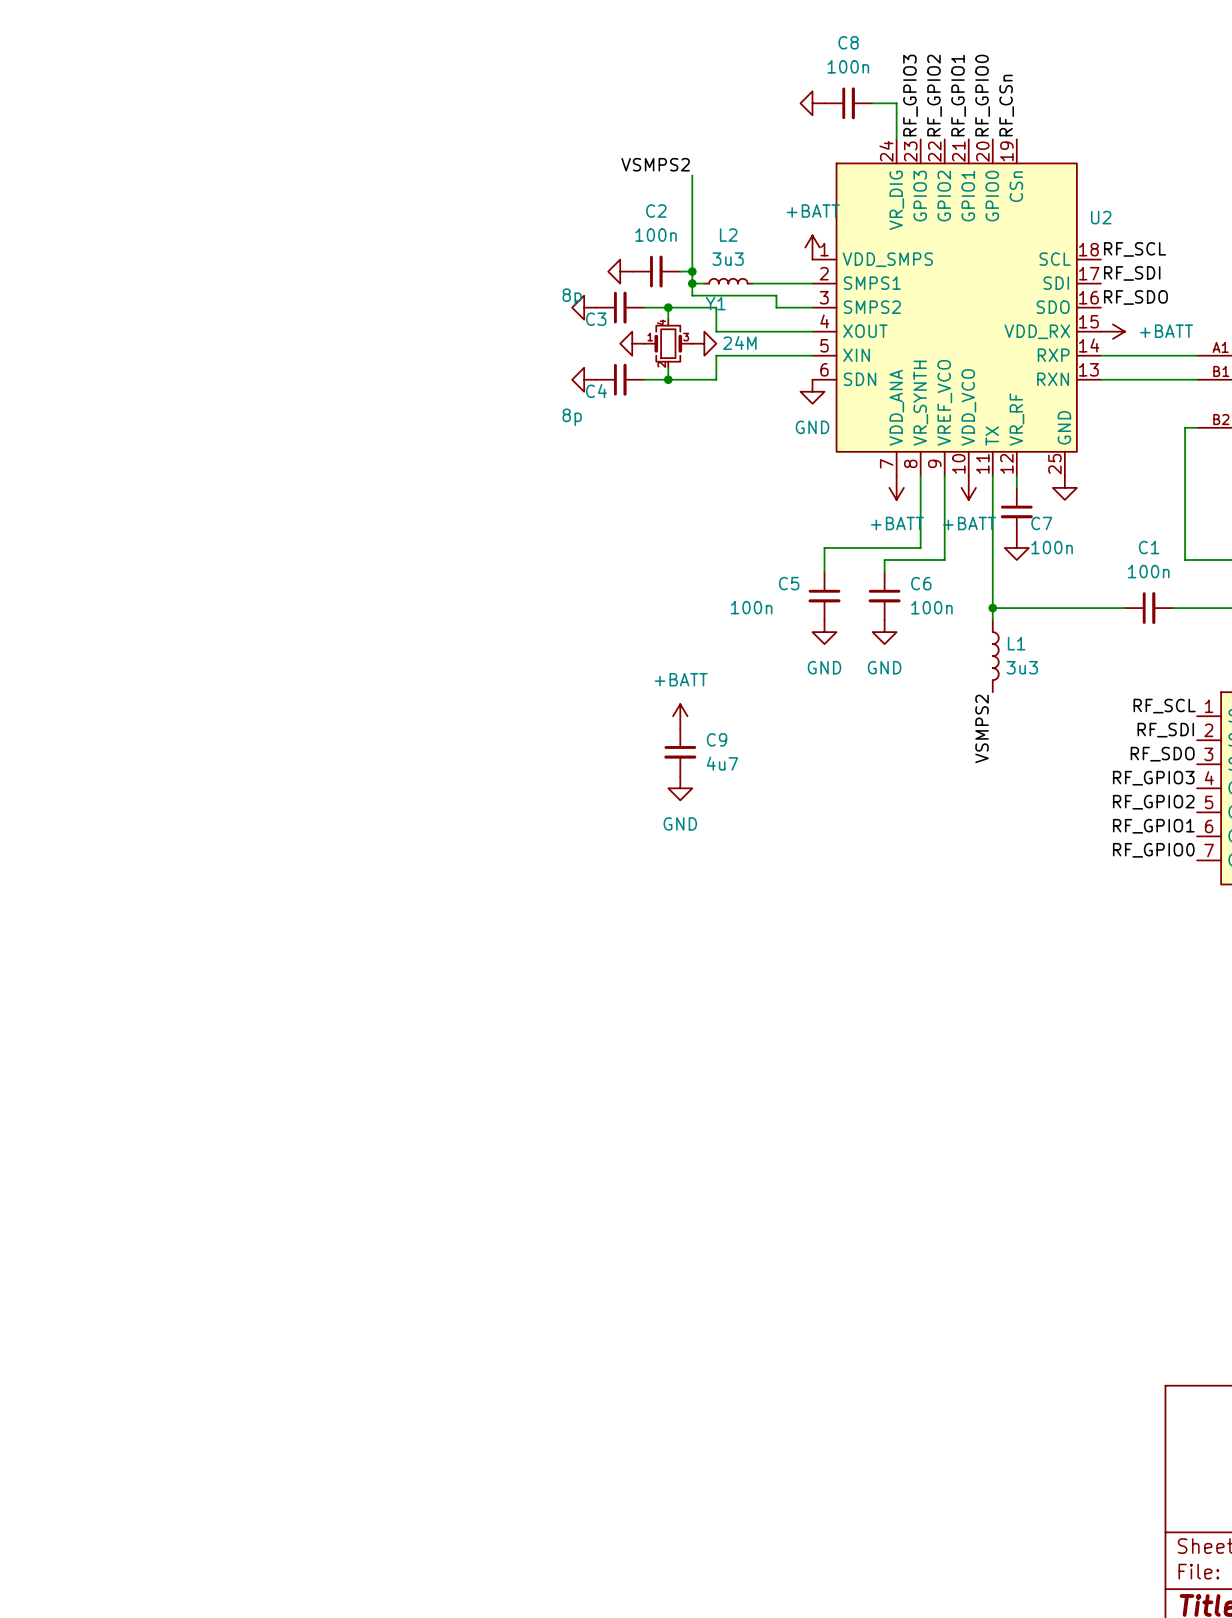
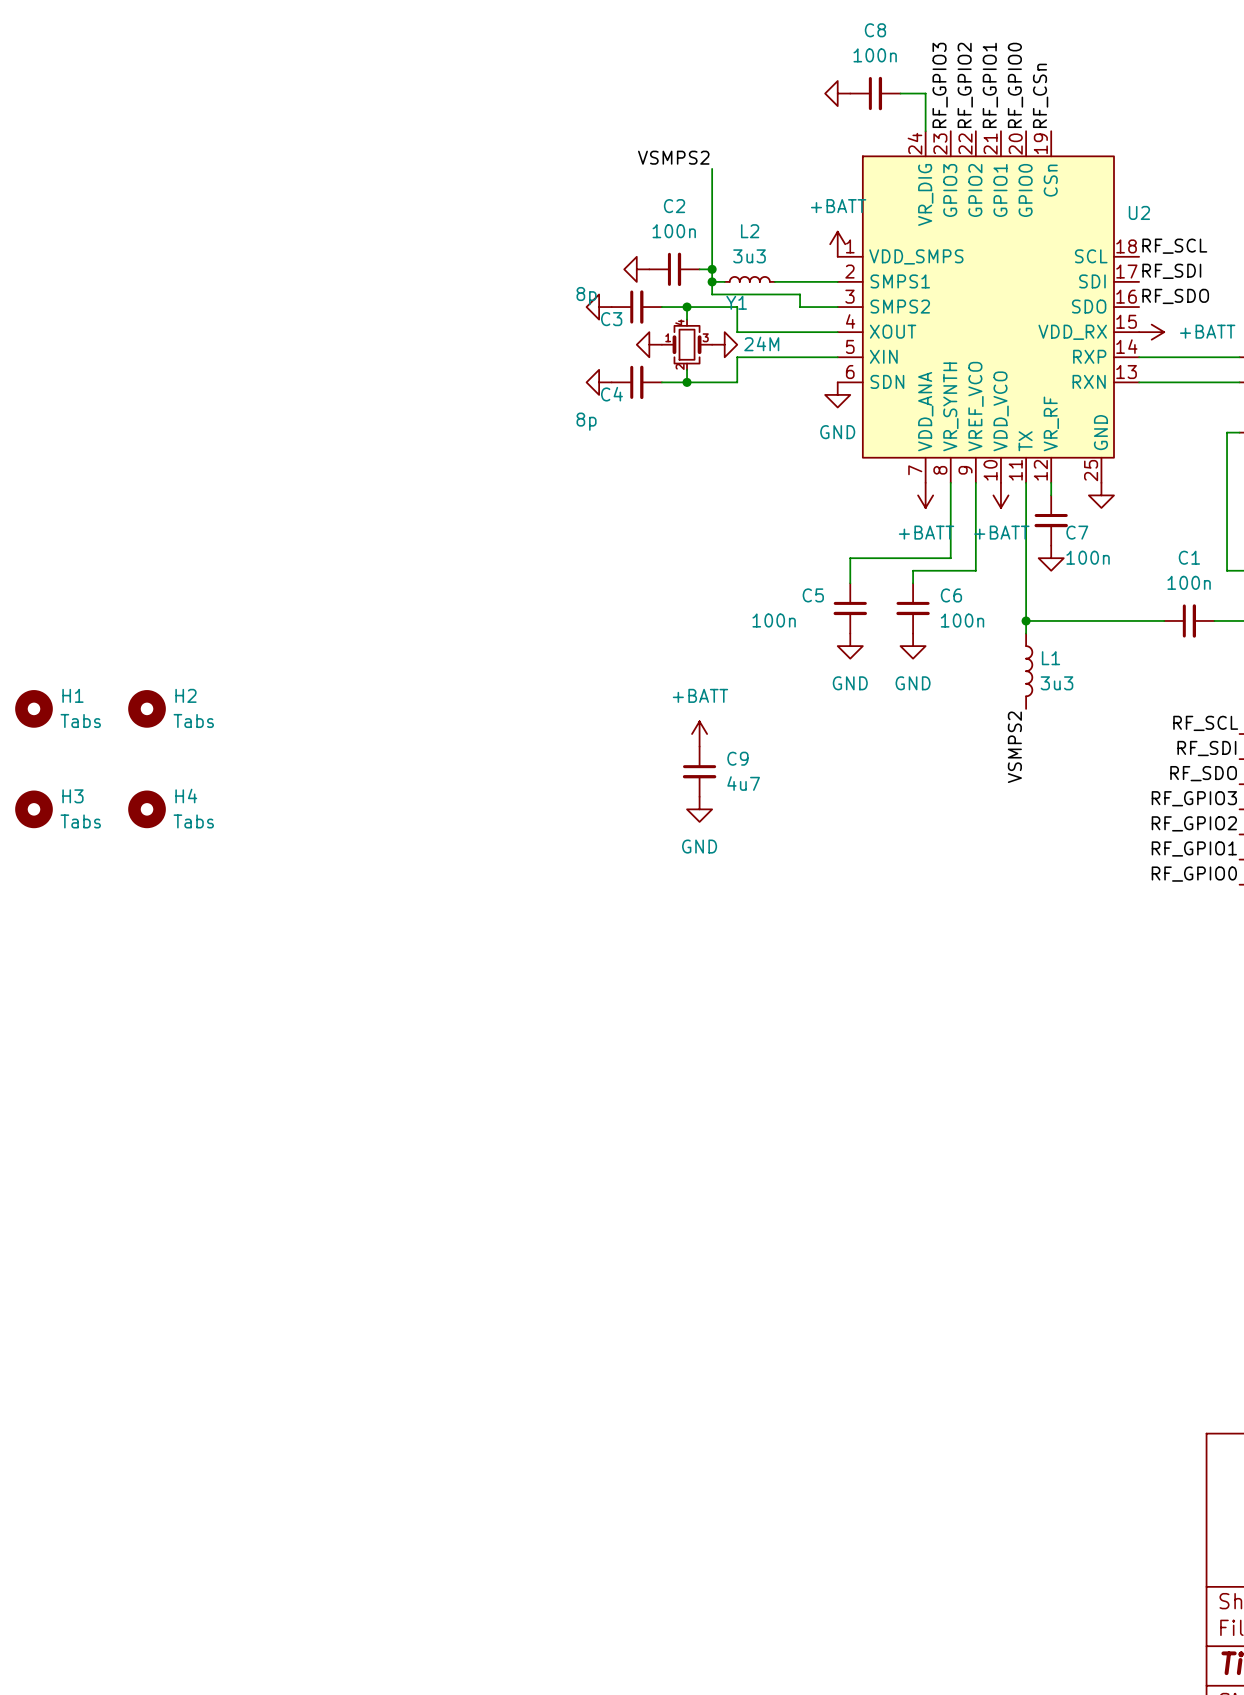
H1: none -> Tabs (33, 708)
H2: none -> Tabs (147, 708)
H3: none -> Tabs (33, 809)
H4: none -> Tabs (147, 809)

